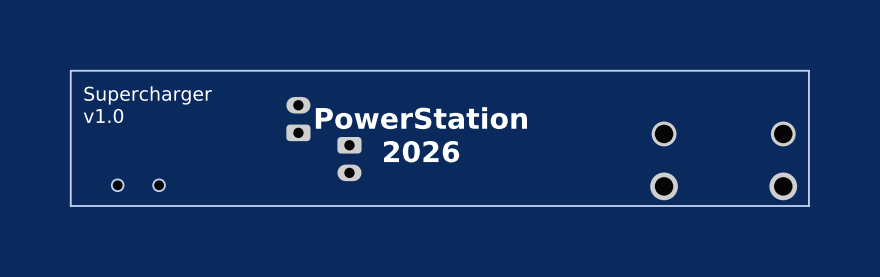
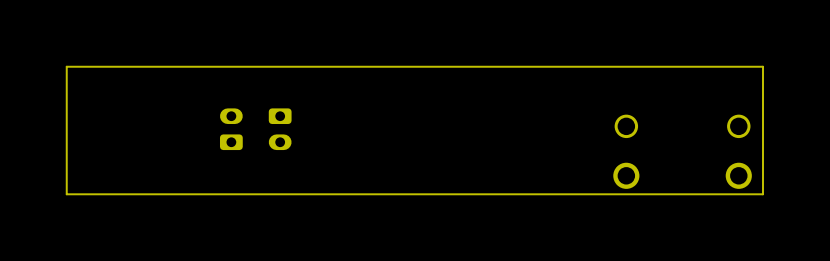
text: Supercharger (148, 95) -> none
text: v1.0 (103, 116) -> none
text: PowerStation (421, 118) -> none
part rotation: 0° (298, 119) -> 180° (280, 129)
part: none -> (231, 129)
text: 2026 (421, 151) -> none
part: (349, 159) -> none
part: (138, 185) -> none

